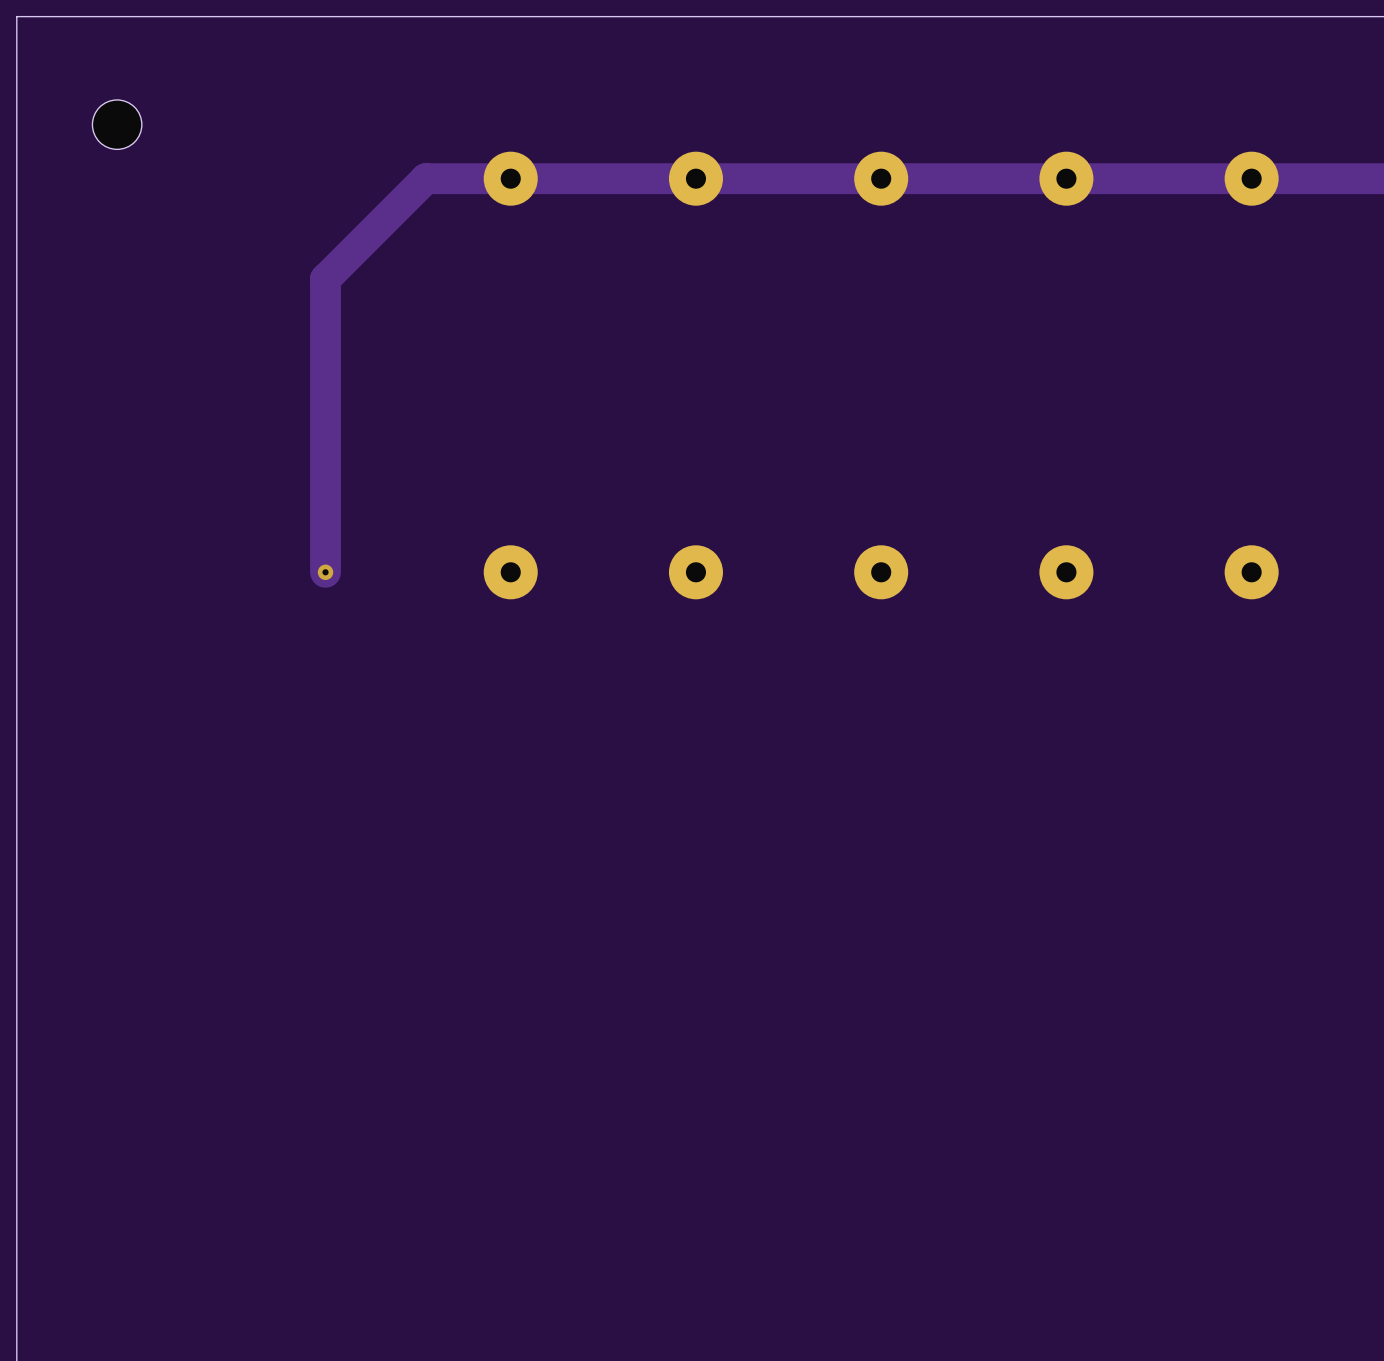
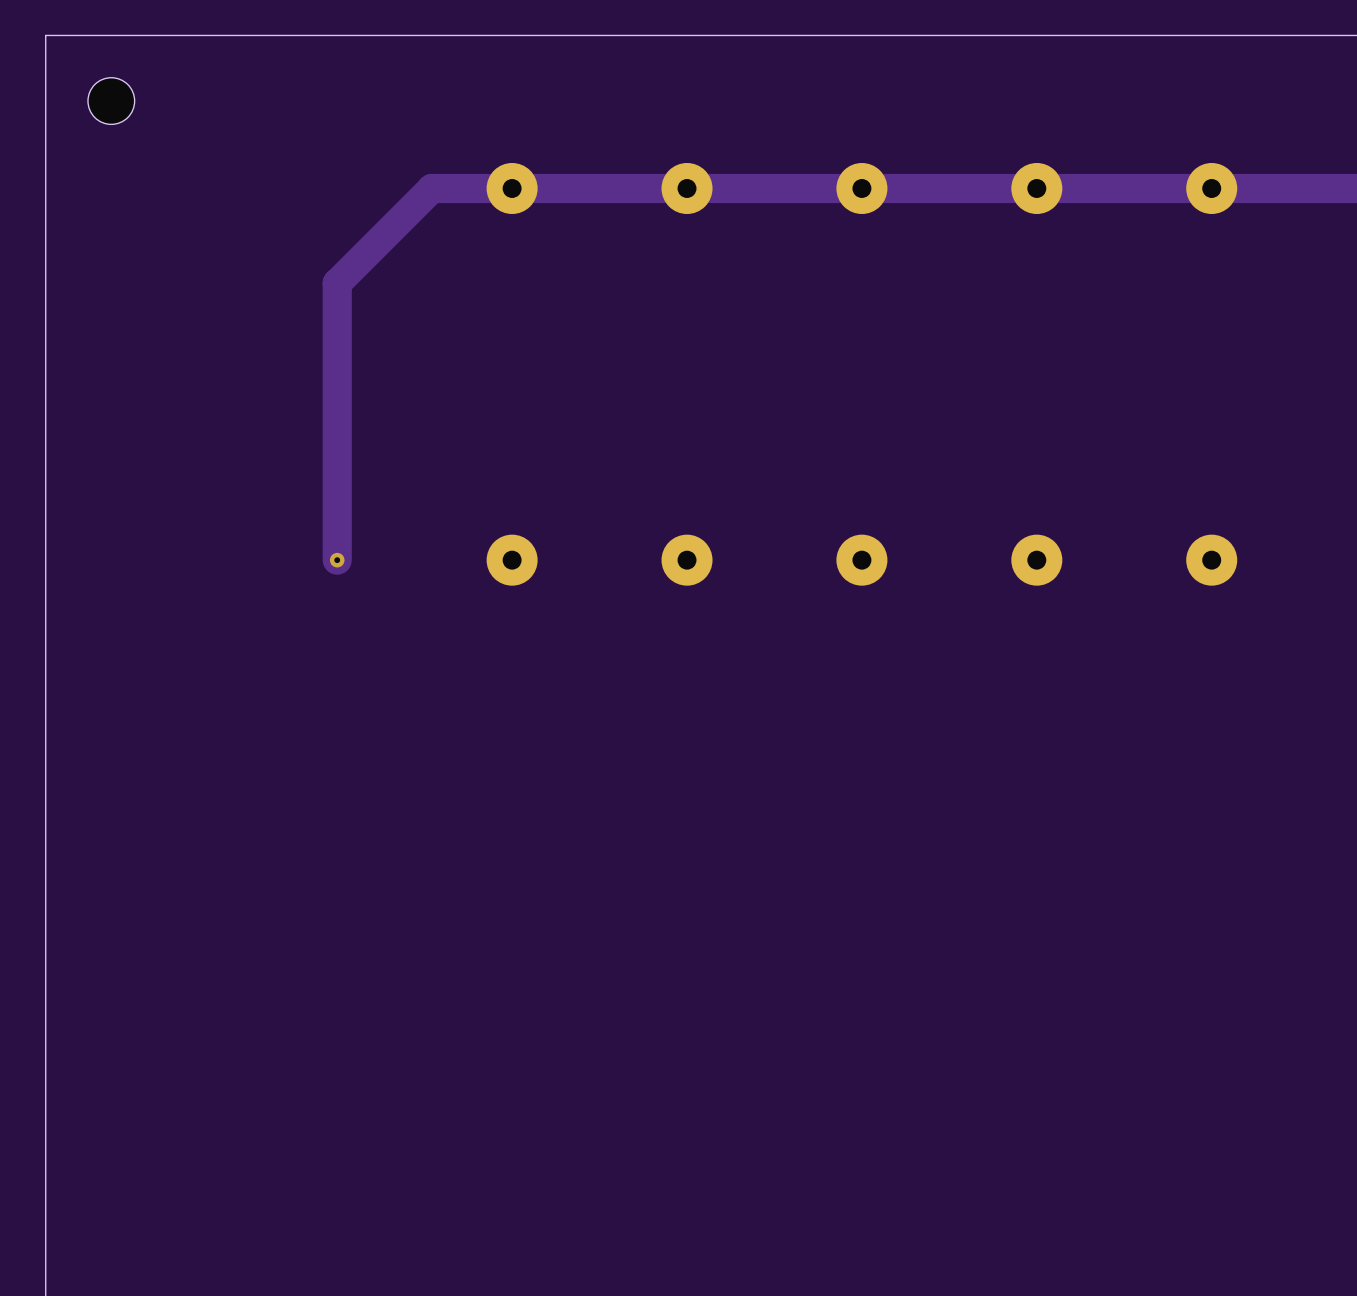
part position: (117, 124) -> (111, 101)

